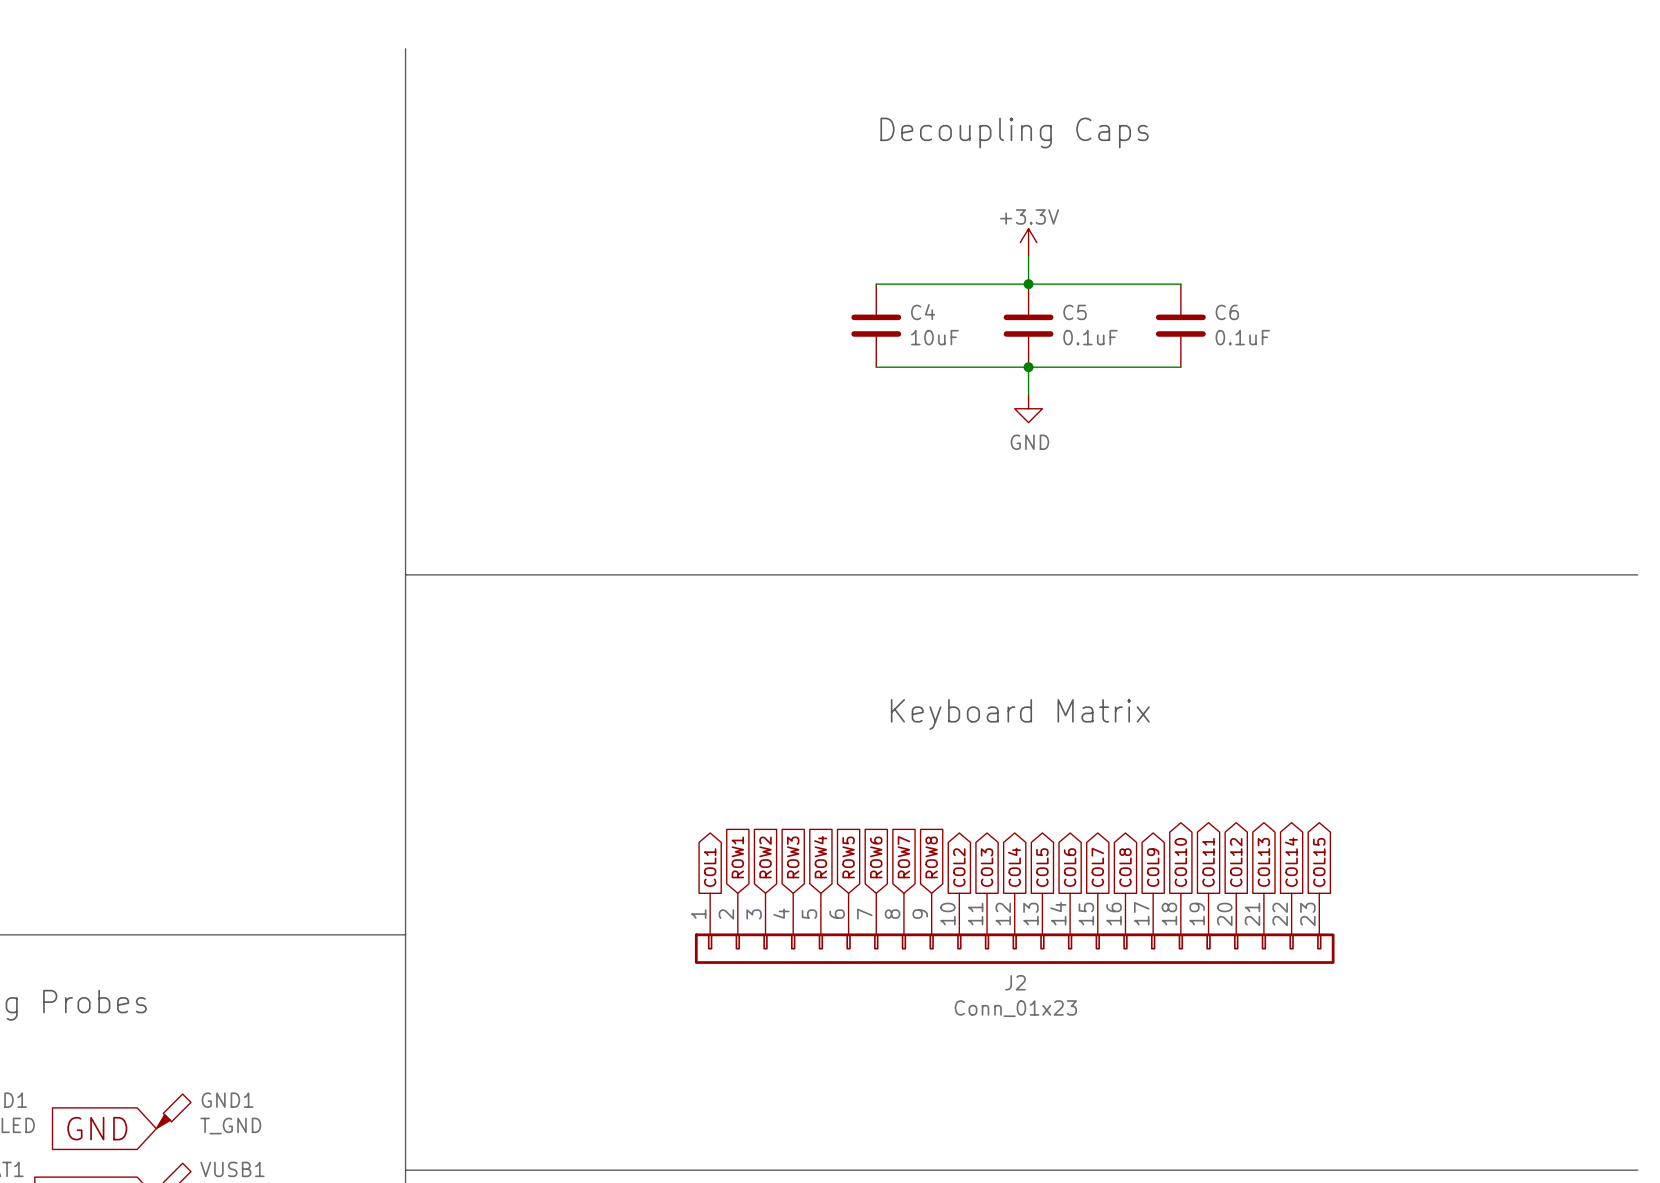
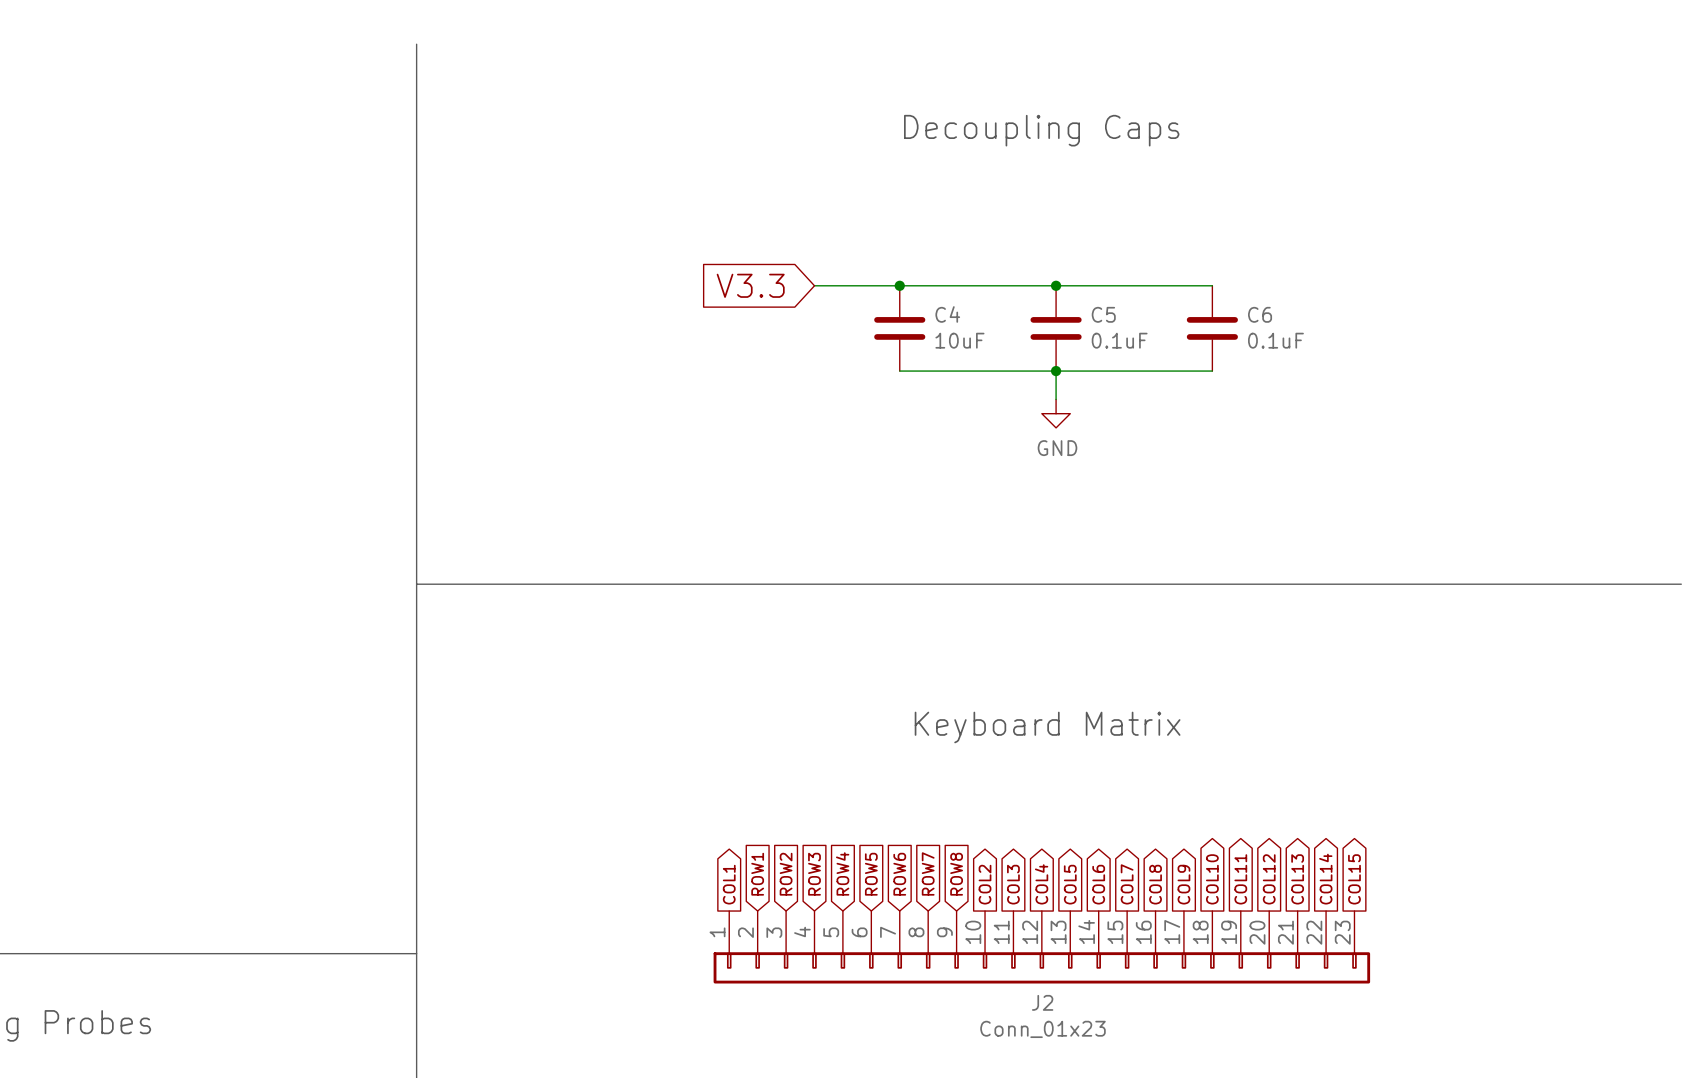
power symbol: +3.3V (1028, 242) -> none
wire: (1028, 256) (1028, 284) -> none
global label: none -> V3.3 (750, 285)
wire: none -> (814, 285) (899, 285)
junction: none -> (899, 285)

